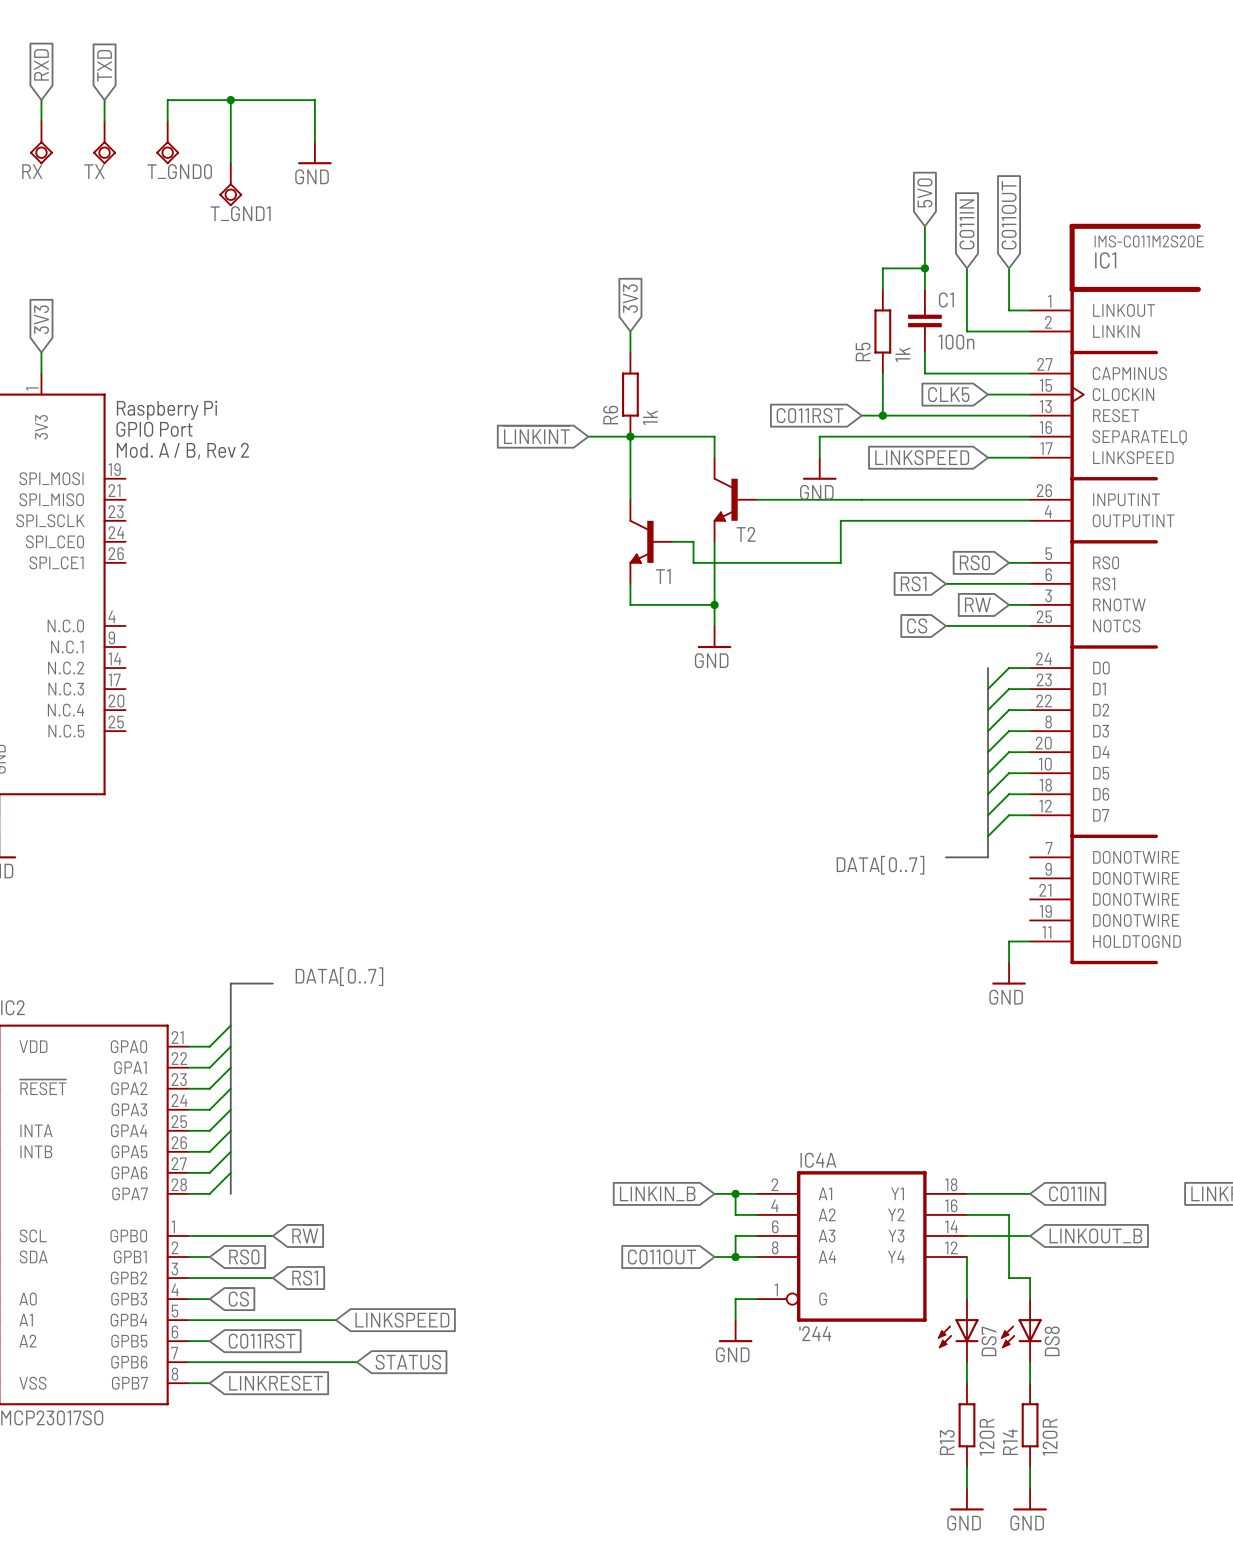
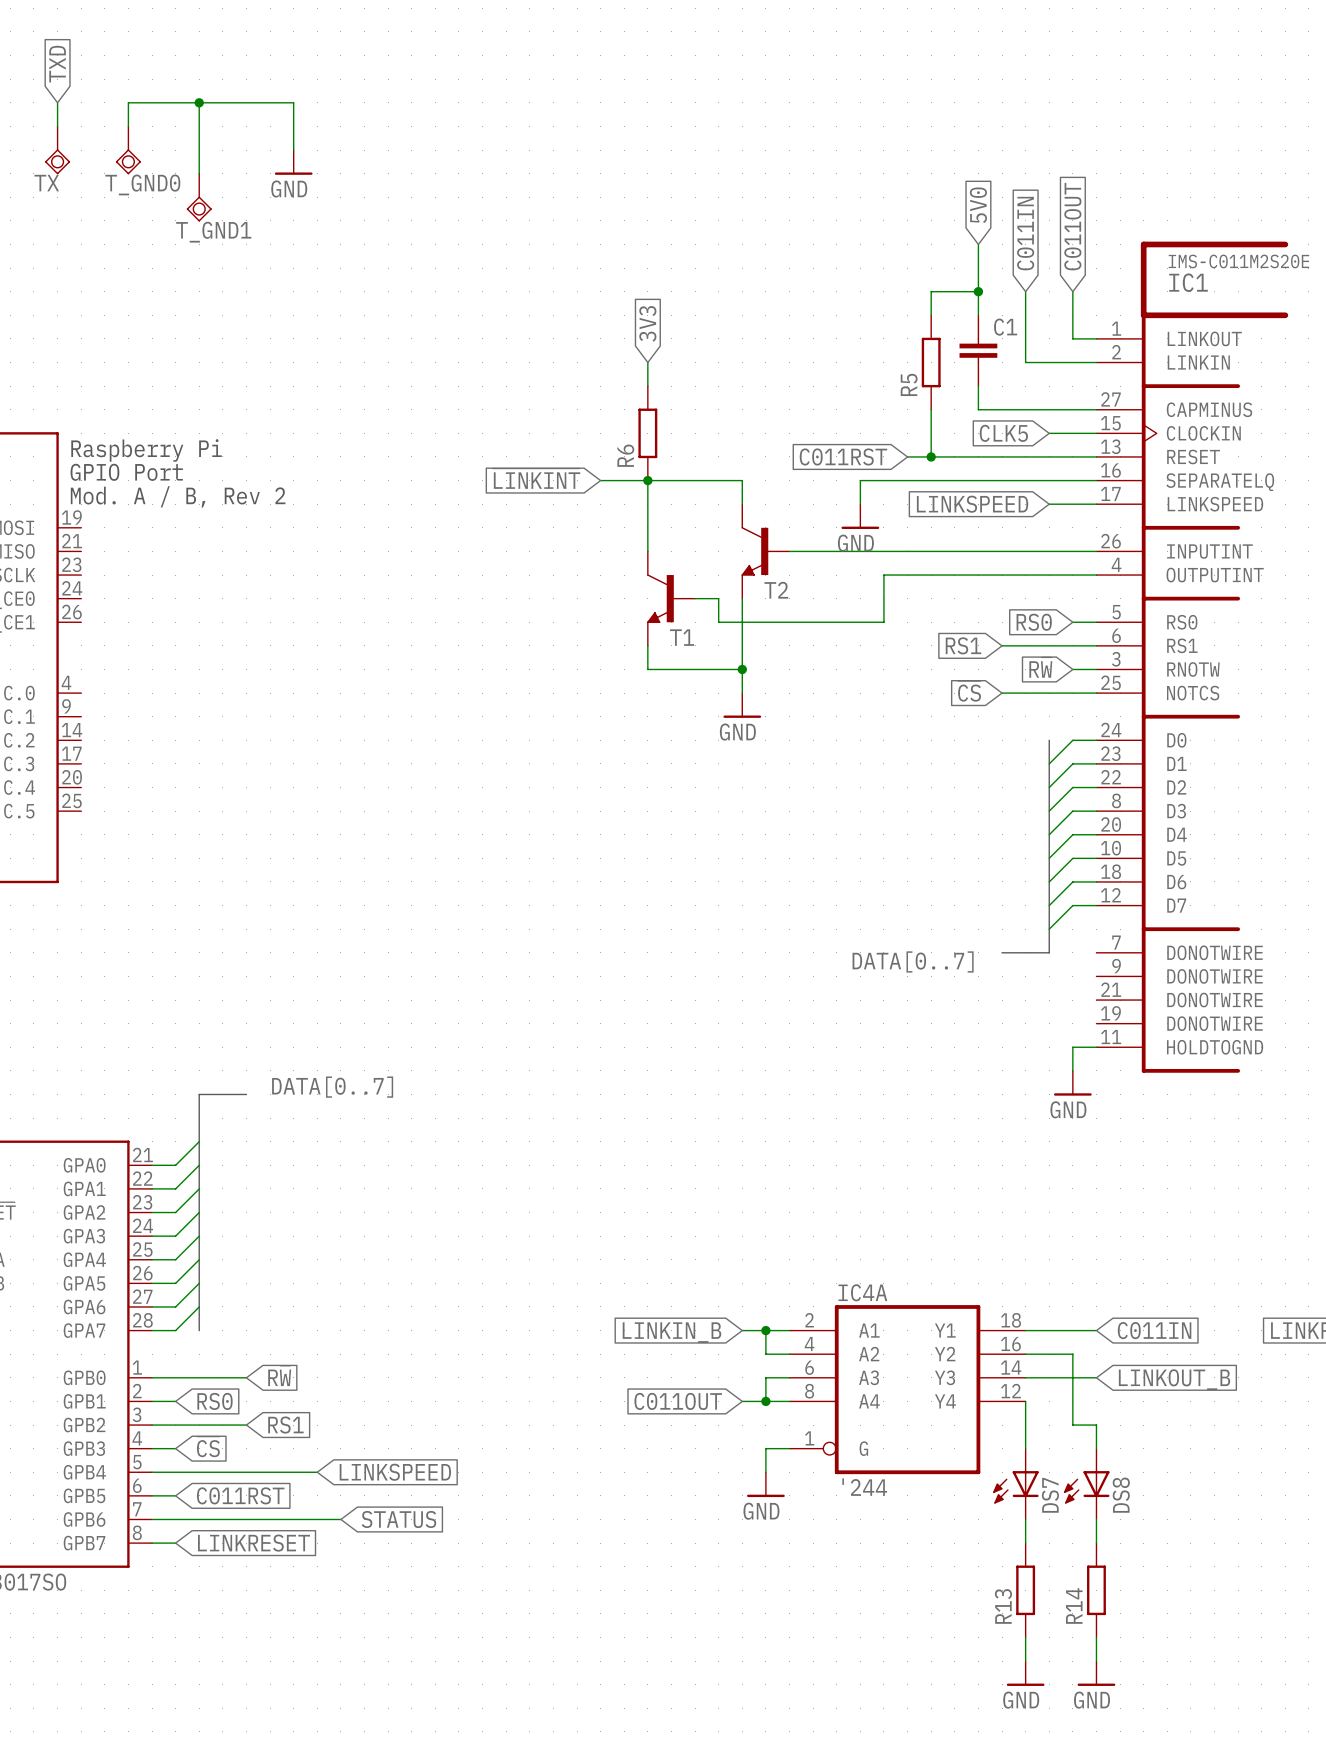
C1 value: 100n (956, 342) -> none
R5 value: 1k (902, 354) -> none
R6 value: 1k (650, 417) -> none
R13 value: 120R (986, 1437) -> none
R14 value: 120R (1050, 1437) -> none

